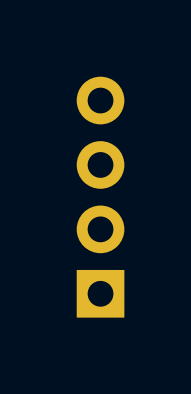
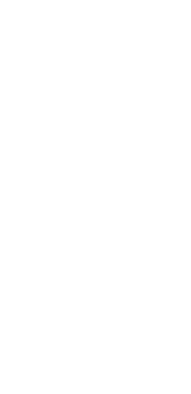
part: (100, 197) -> none

